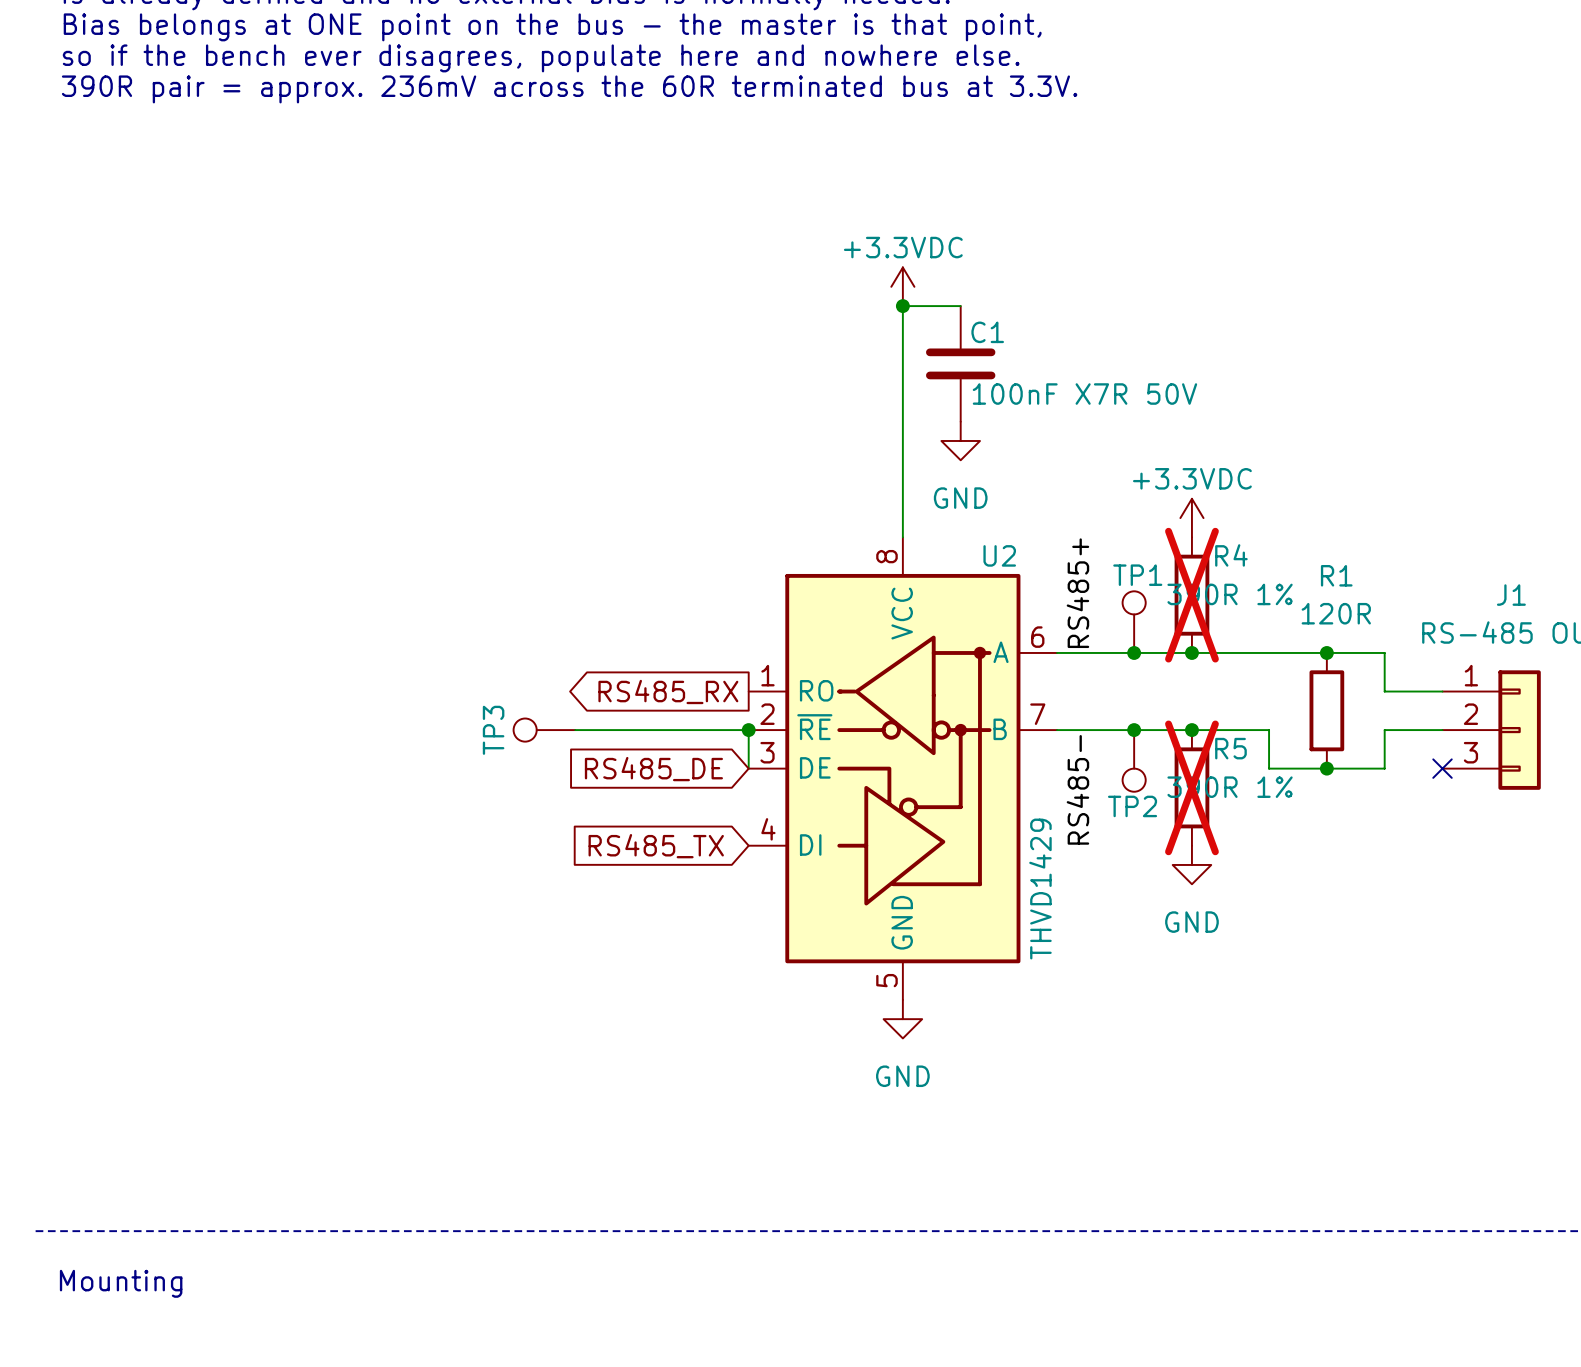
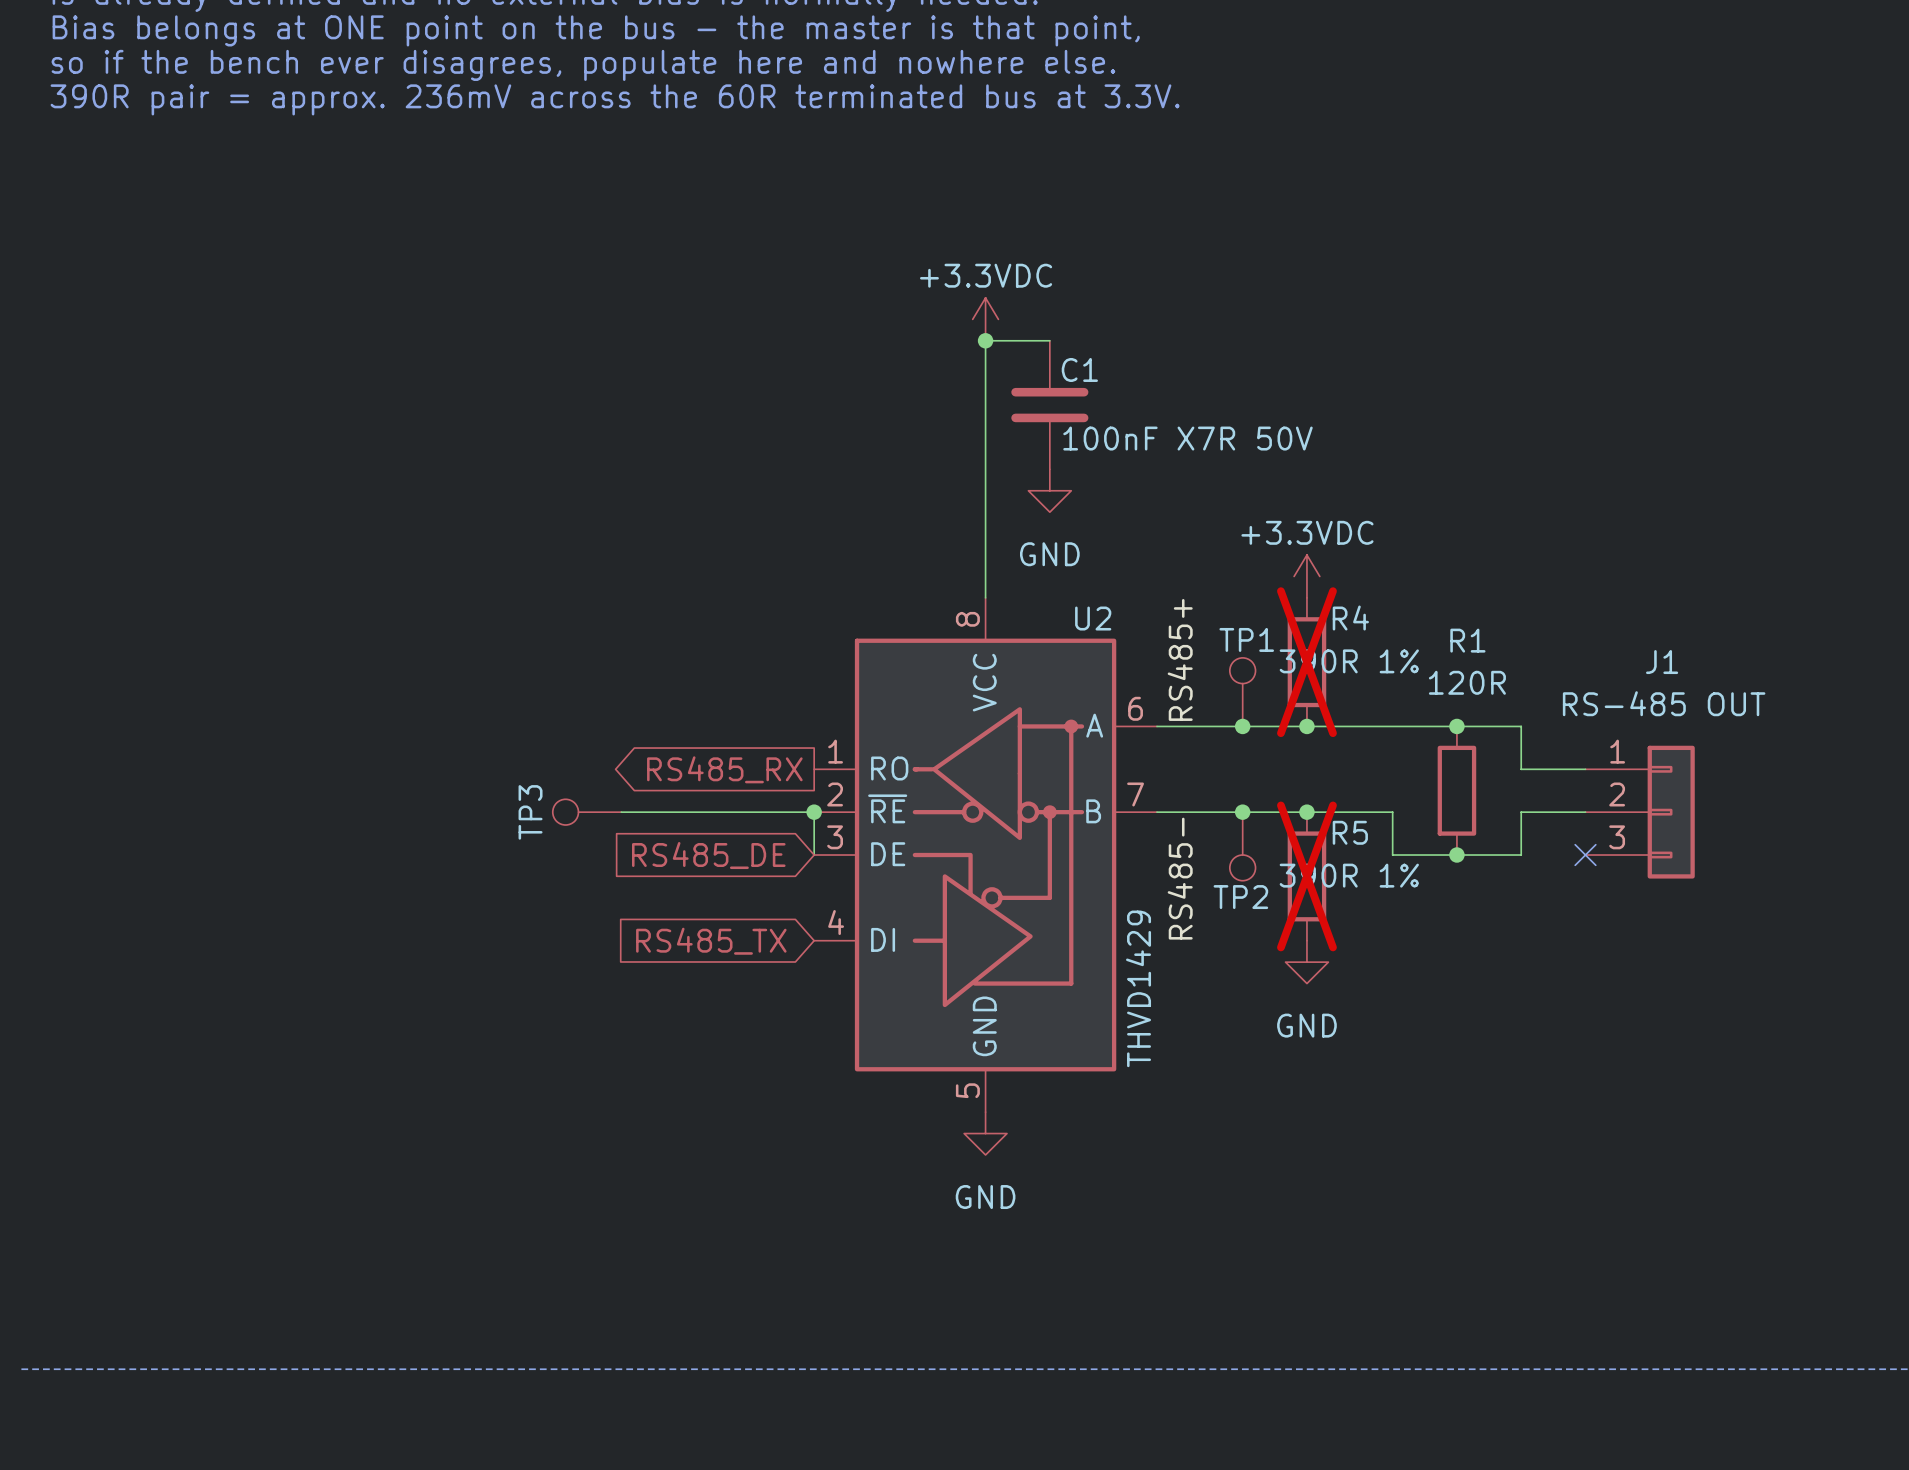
text: Mounting (121, 1283) -> none

